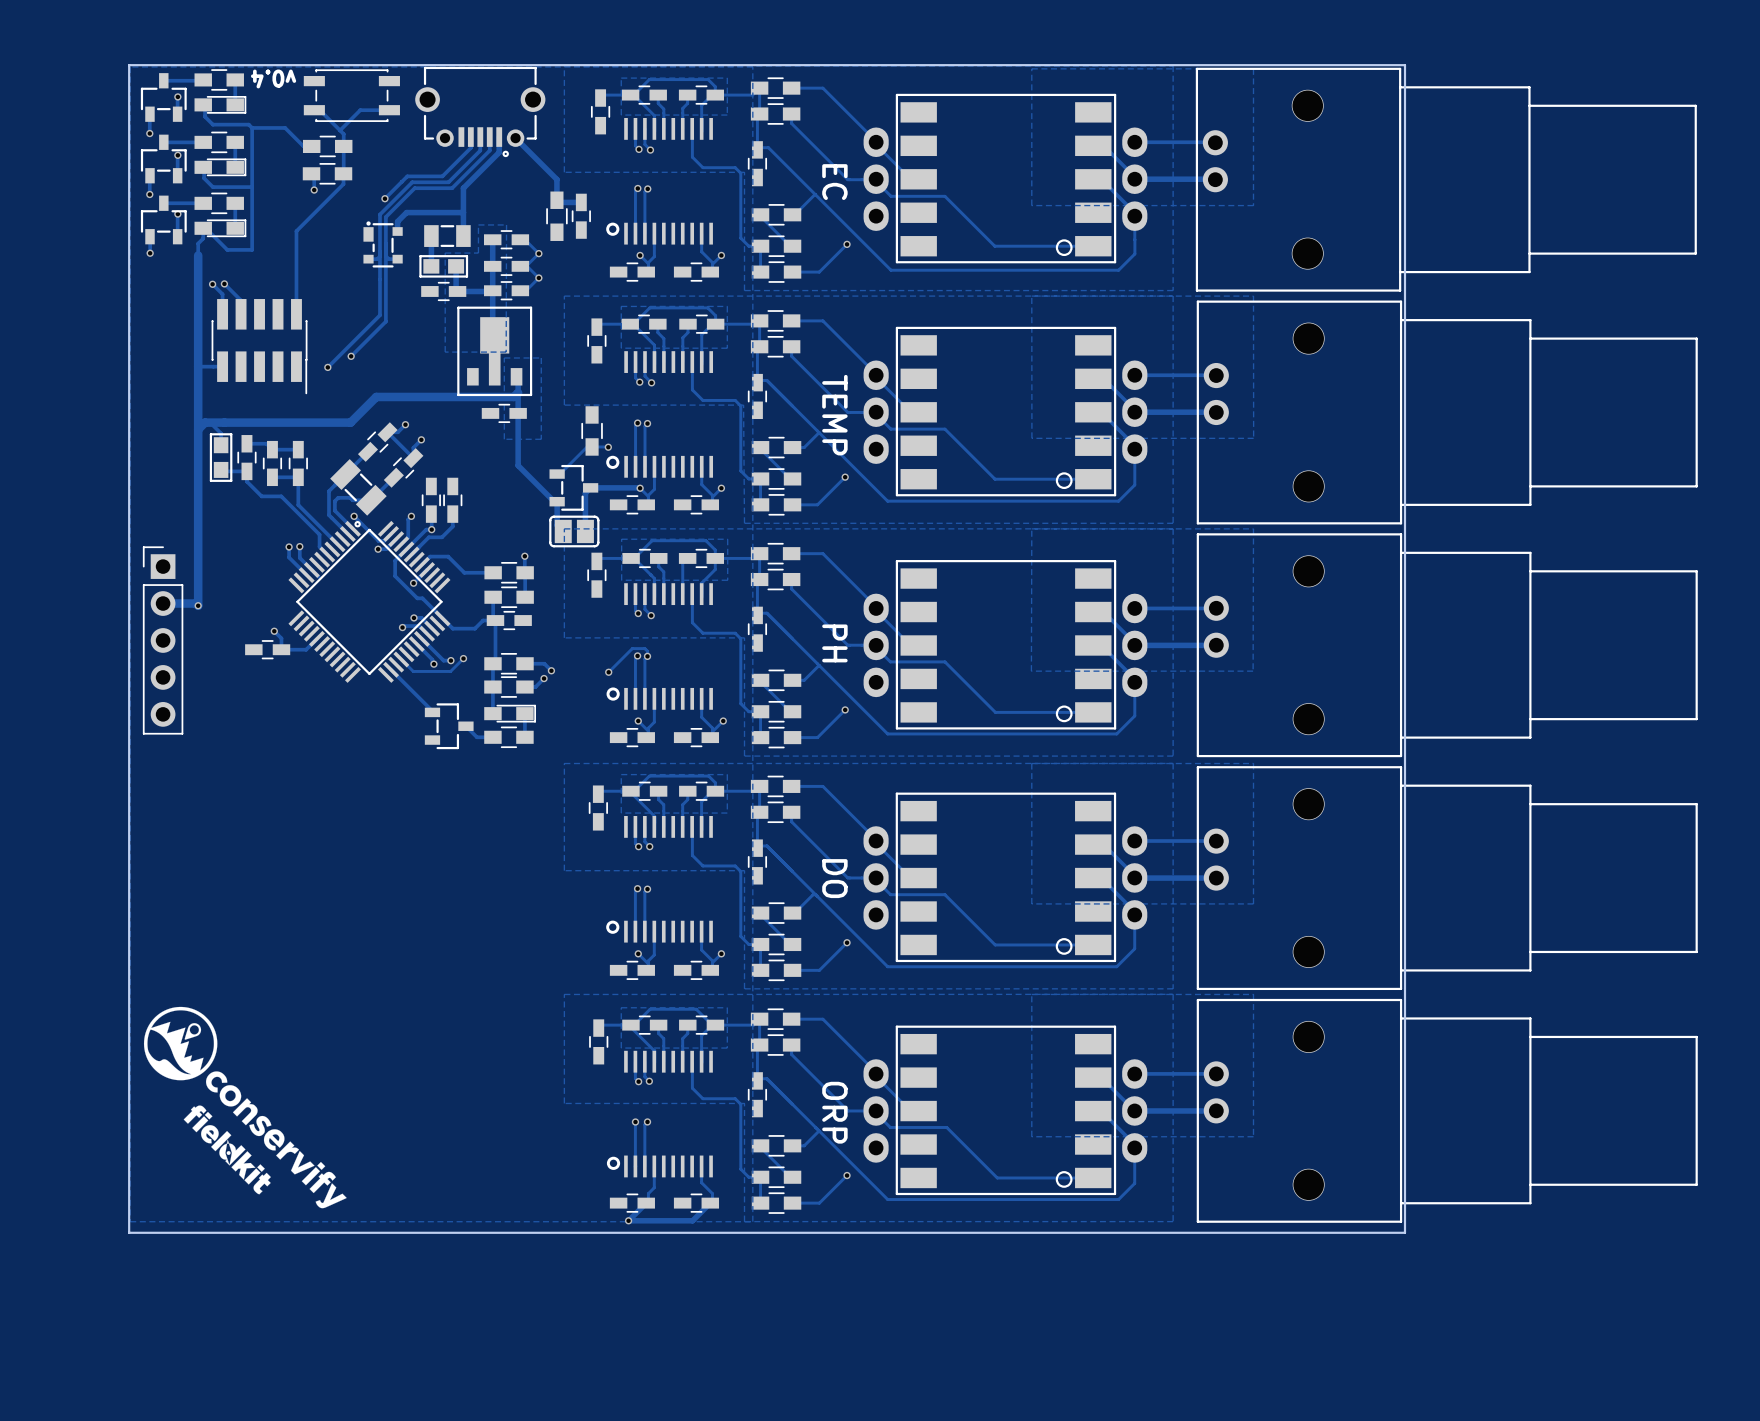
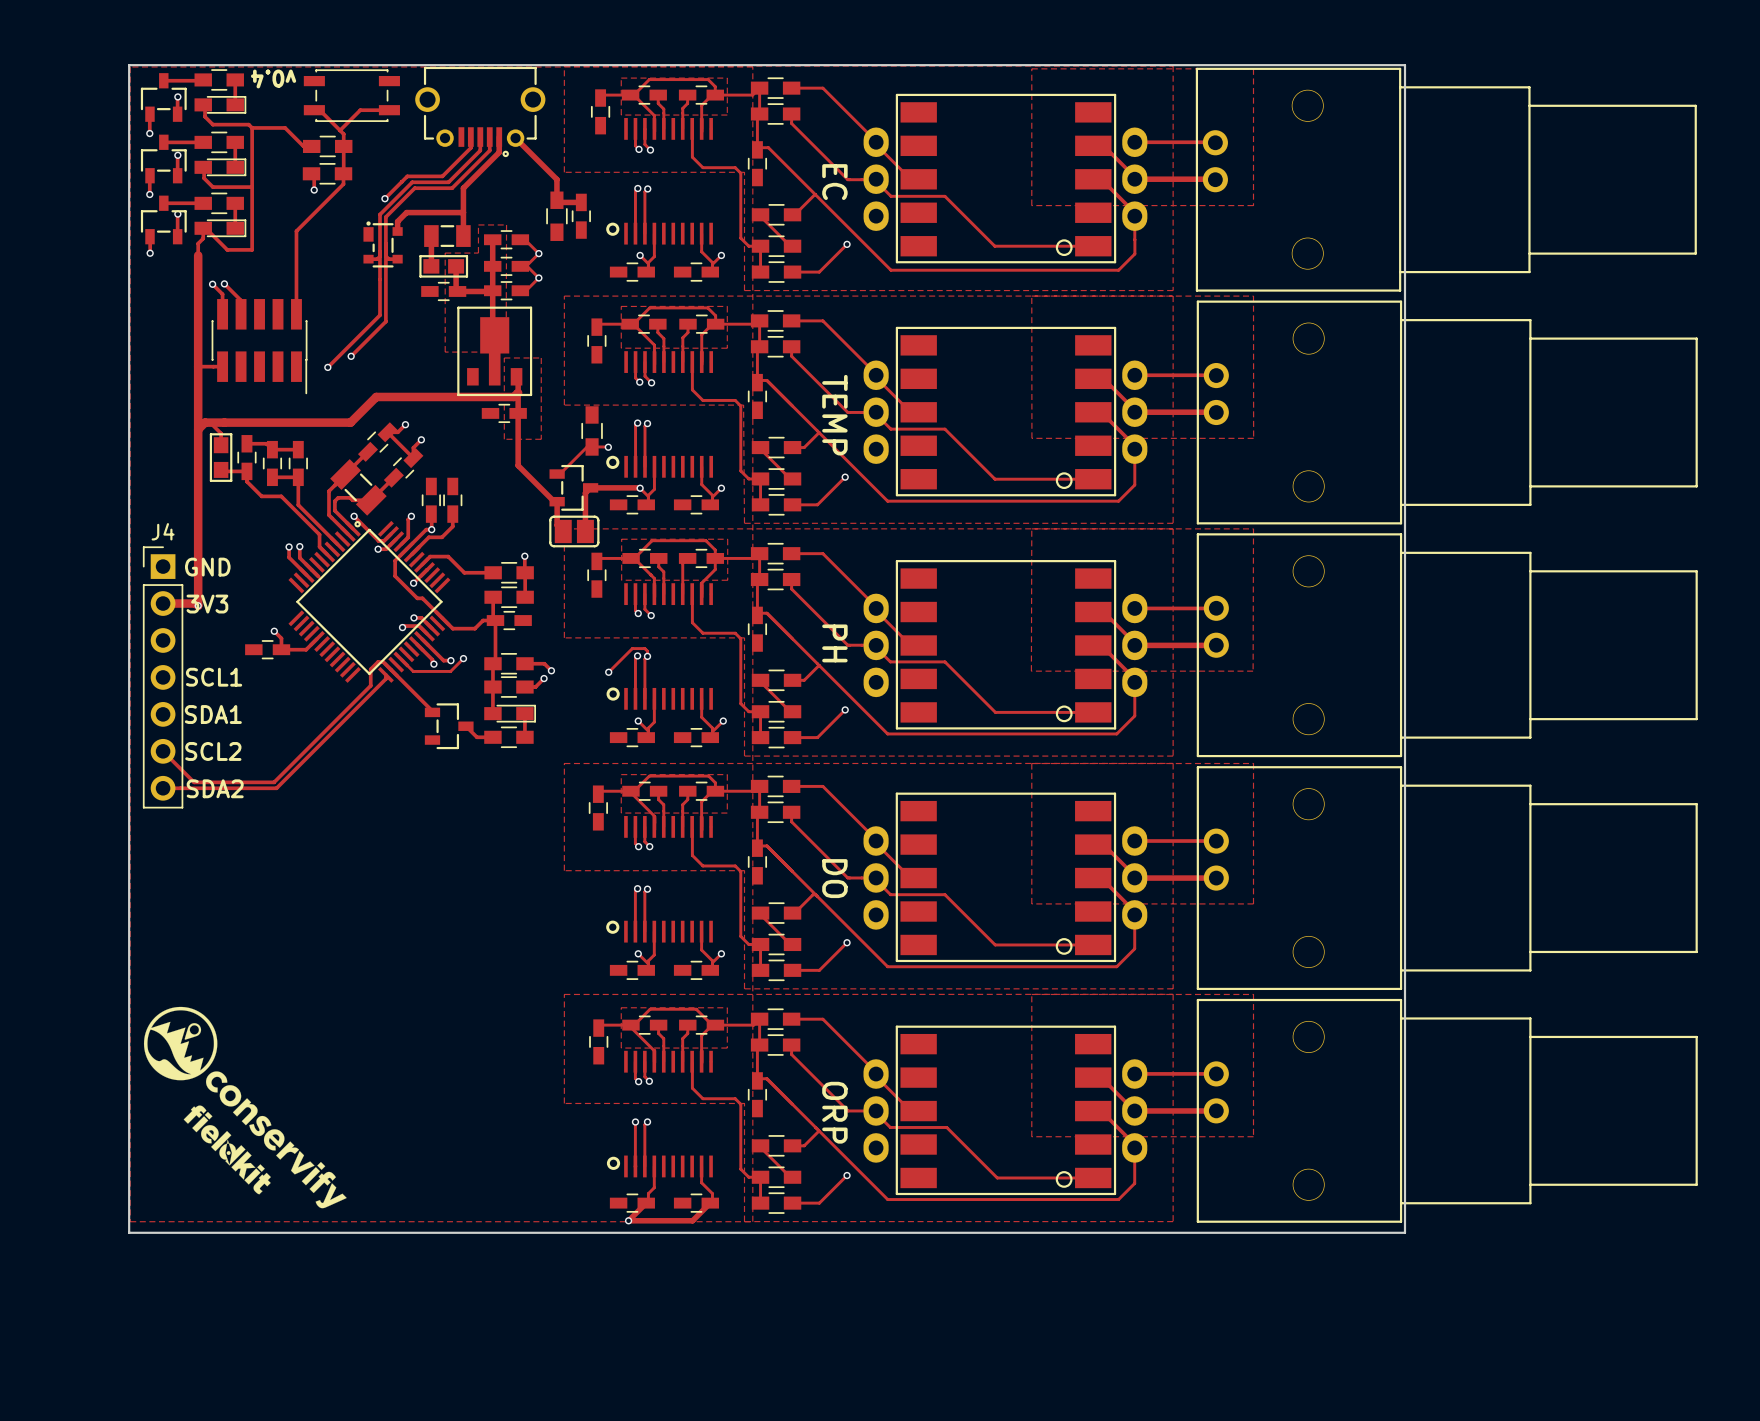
text: none -> GND (207, 567)
text: none -> 3V3 (207, 604)
part: (163, 640) -> none
track: none -> (391, 669) (383, 662) (378, 662) (370, 669) (370, 685) (274, 782) (194, 782) (163, 751)
track: none -> (385, 674) (385, 678) (276, 788) (163, 788)
J4: none -> (163, 677)
text: none -> SCL1 (214, 677)
text: none -> SDA1 (213, 714)
text: none -> SCL2 (213, 751)
text: none -> SDA2 (215, 788)

